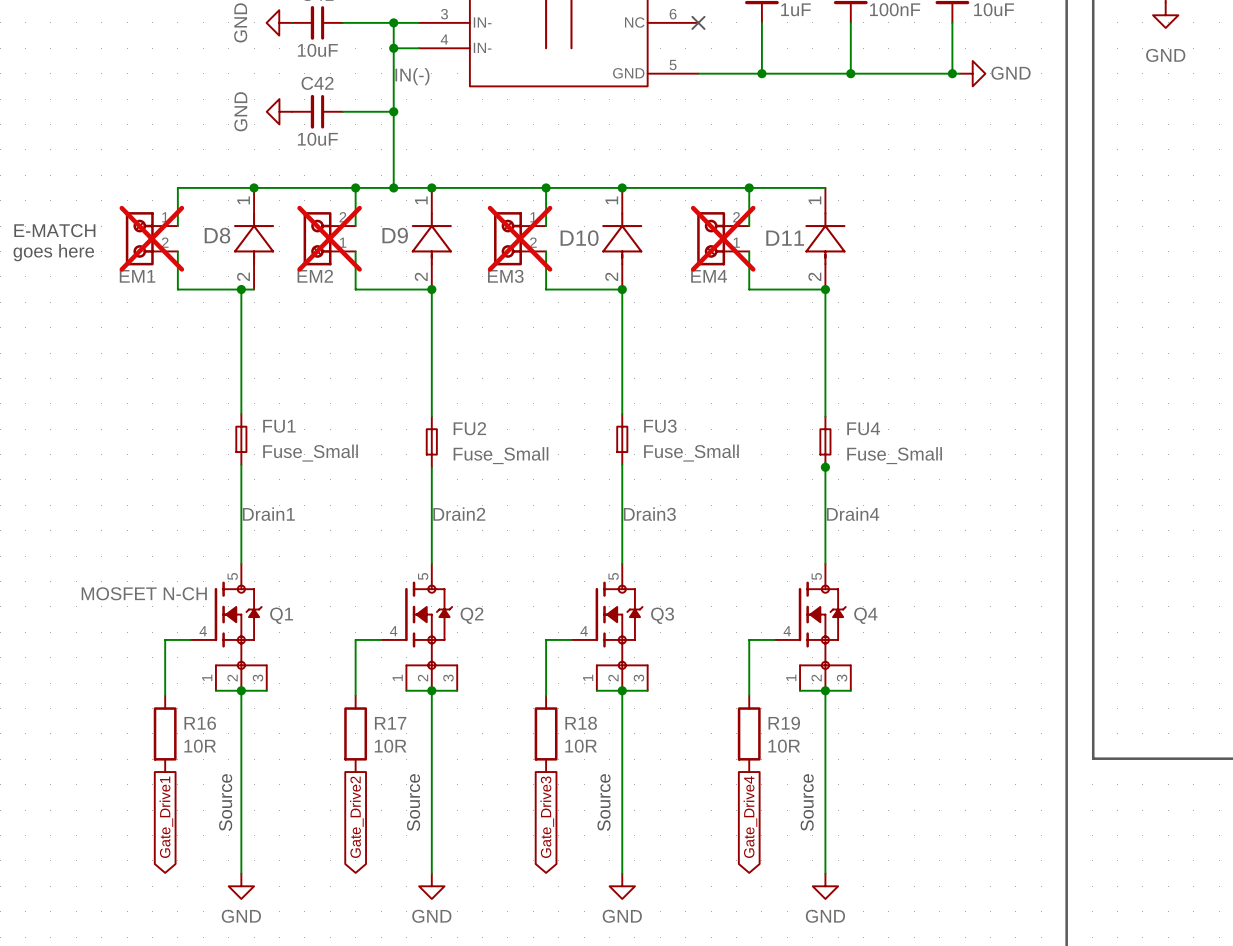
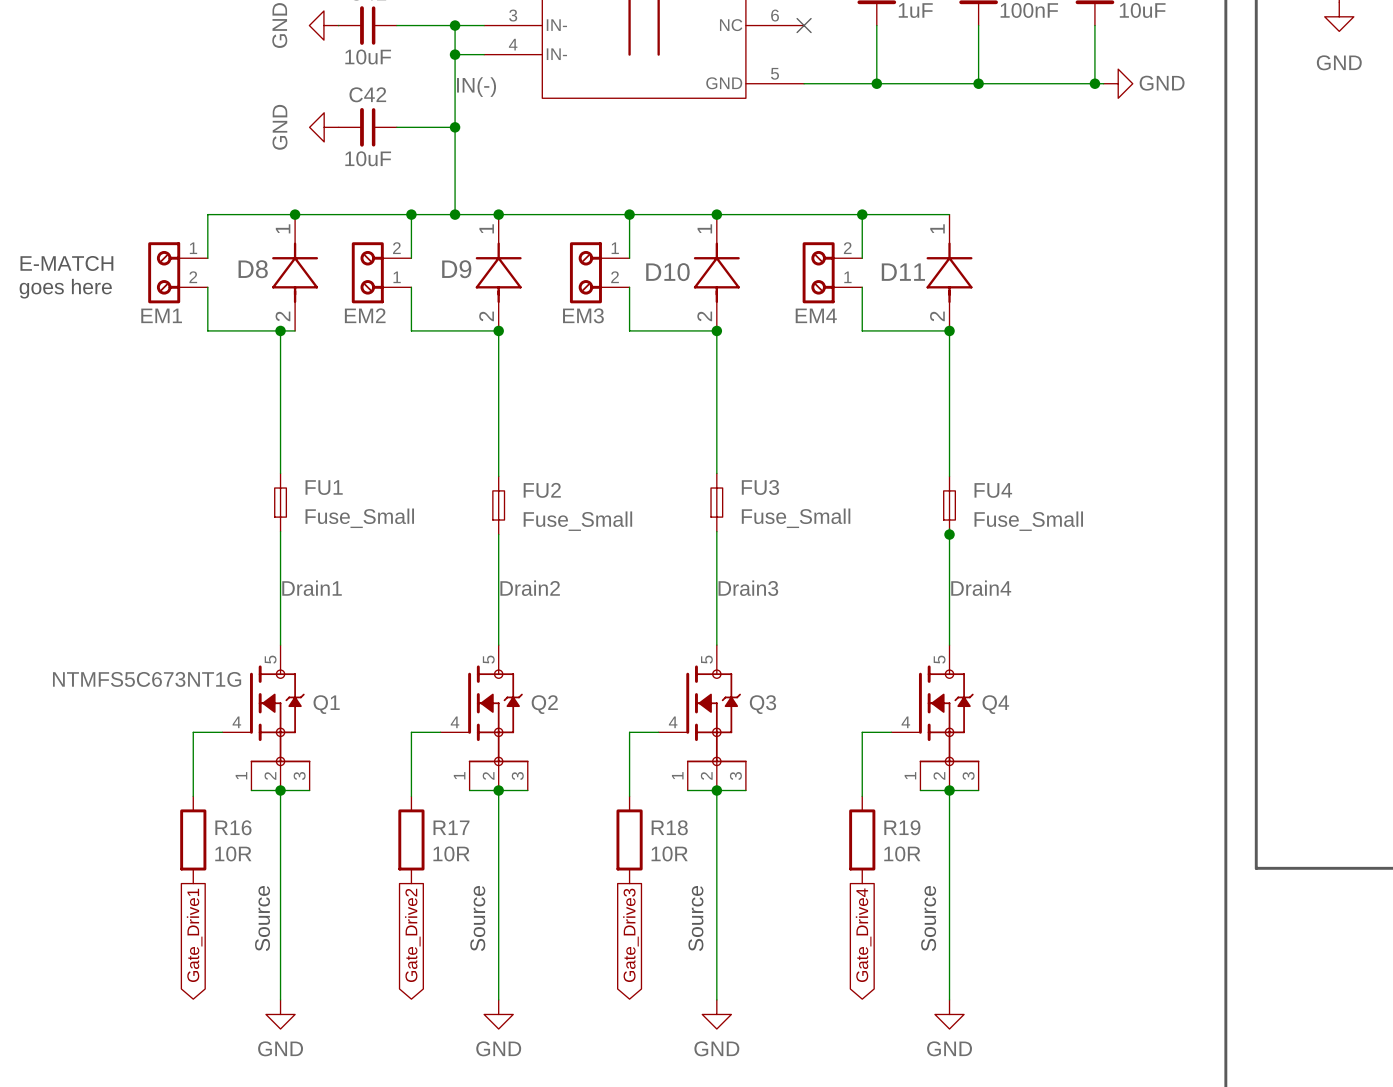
EM1 do-not-place cross: (151, 238) -> none
EM2 do-not-place cross: (329, 238) -> none
EM3 do-not-place cross: (520, 238) -> none
EM4 do-not-place cross: (723, 238) -> none
Q1 value: MOSFET N-CH (144, 593) -> NTMFS5C673NT1G (147, 679)

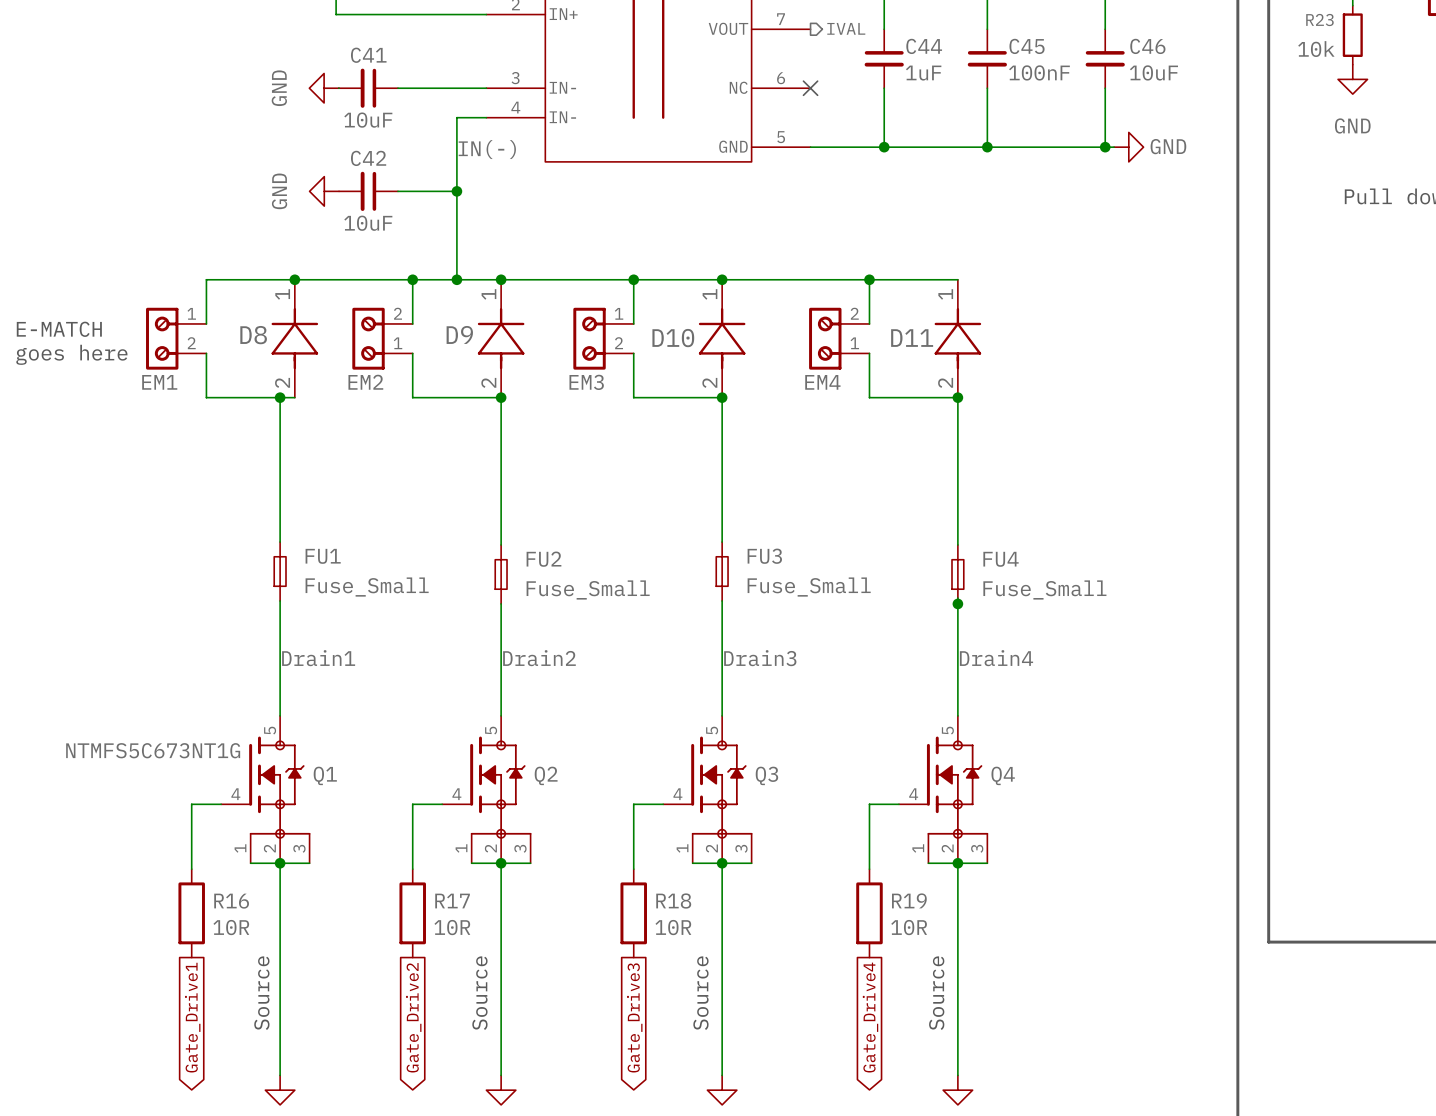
wire: (455, 25) (455, 54) -> none
junction: (455, 25) -> none
junction: (455, 54) -> none

